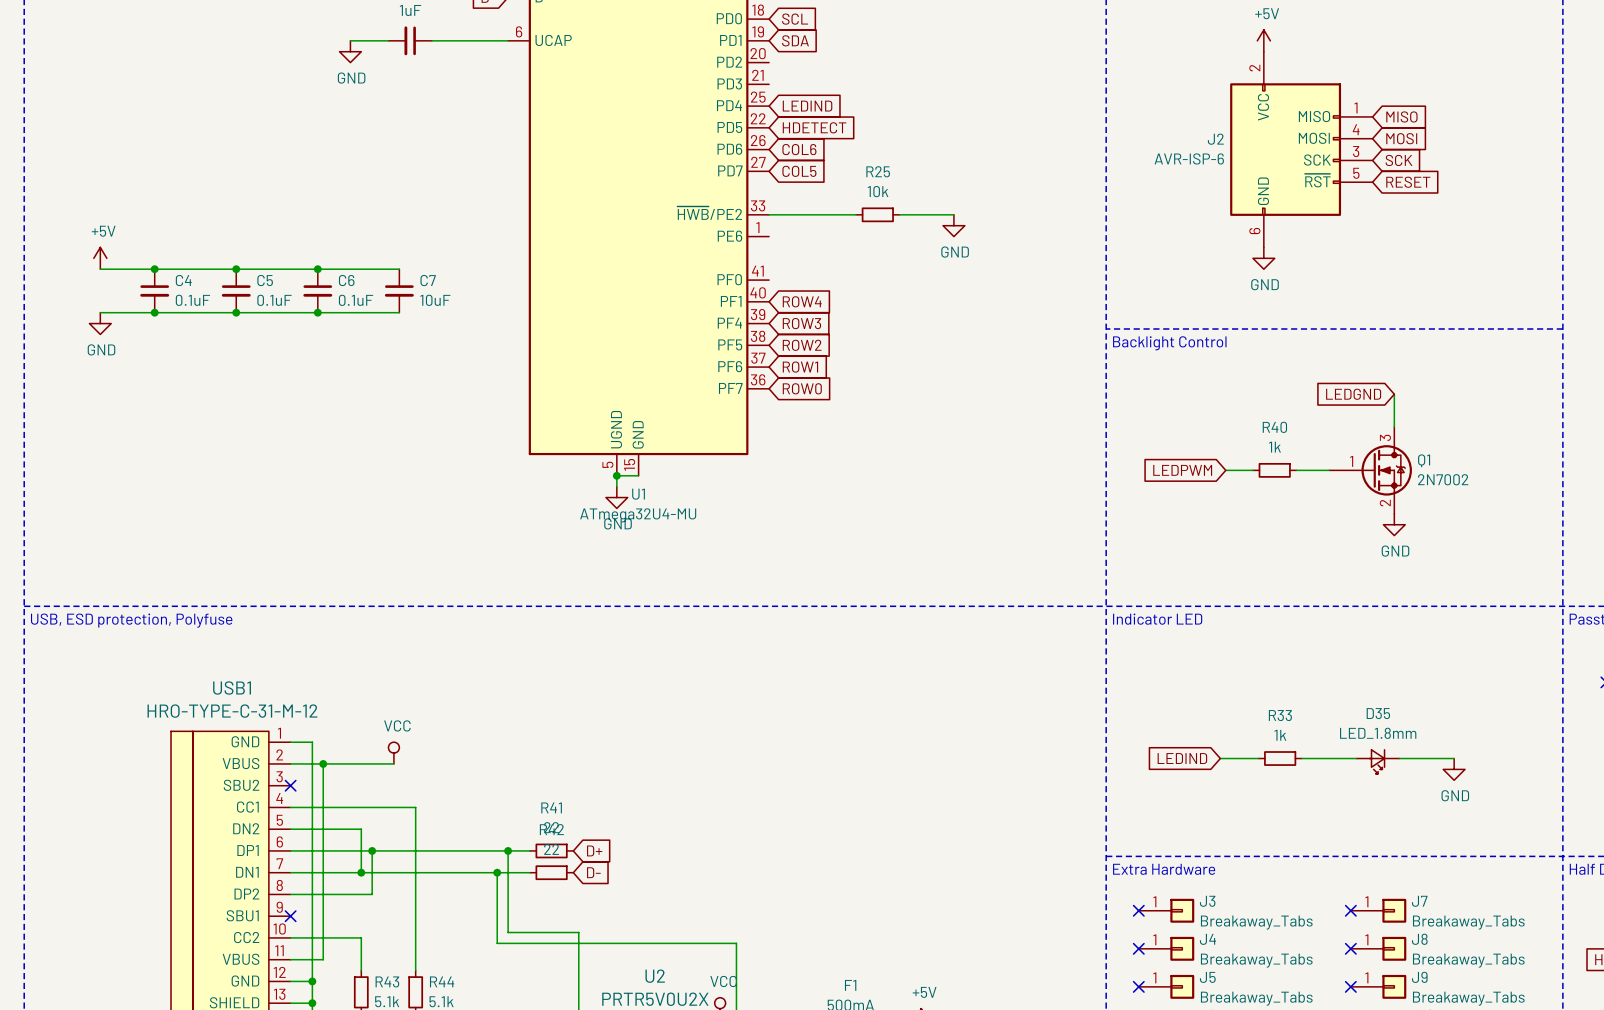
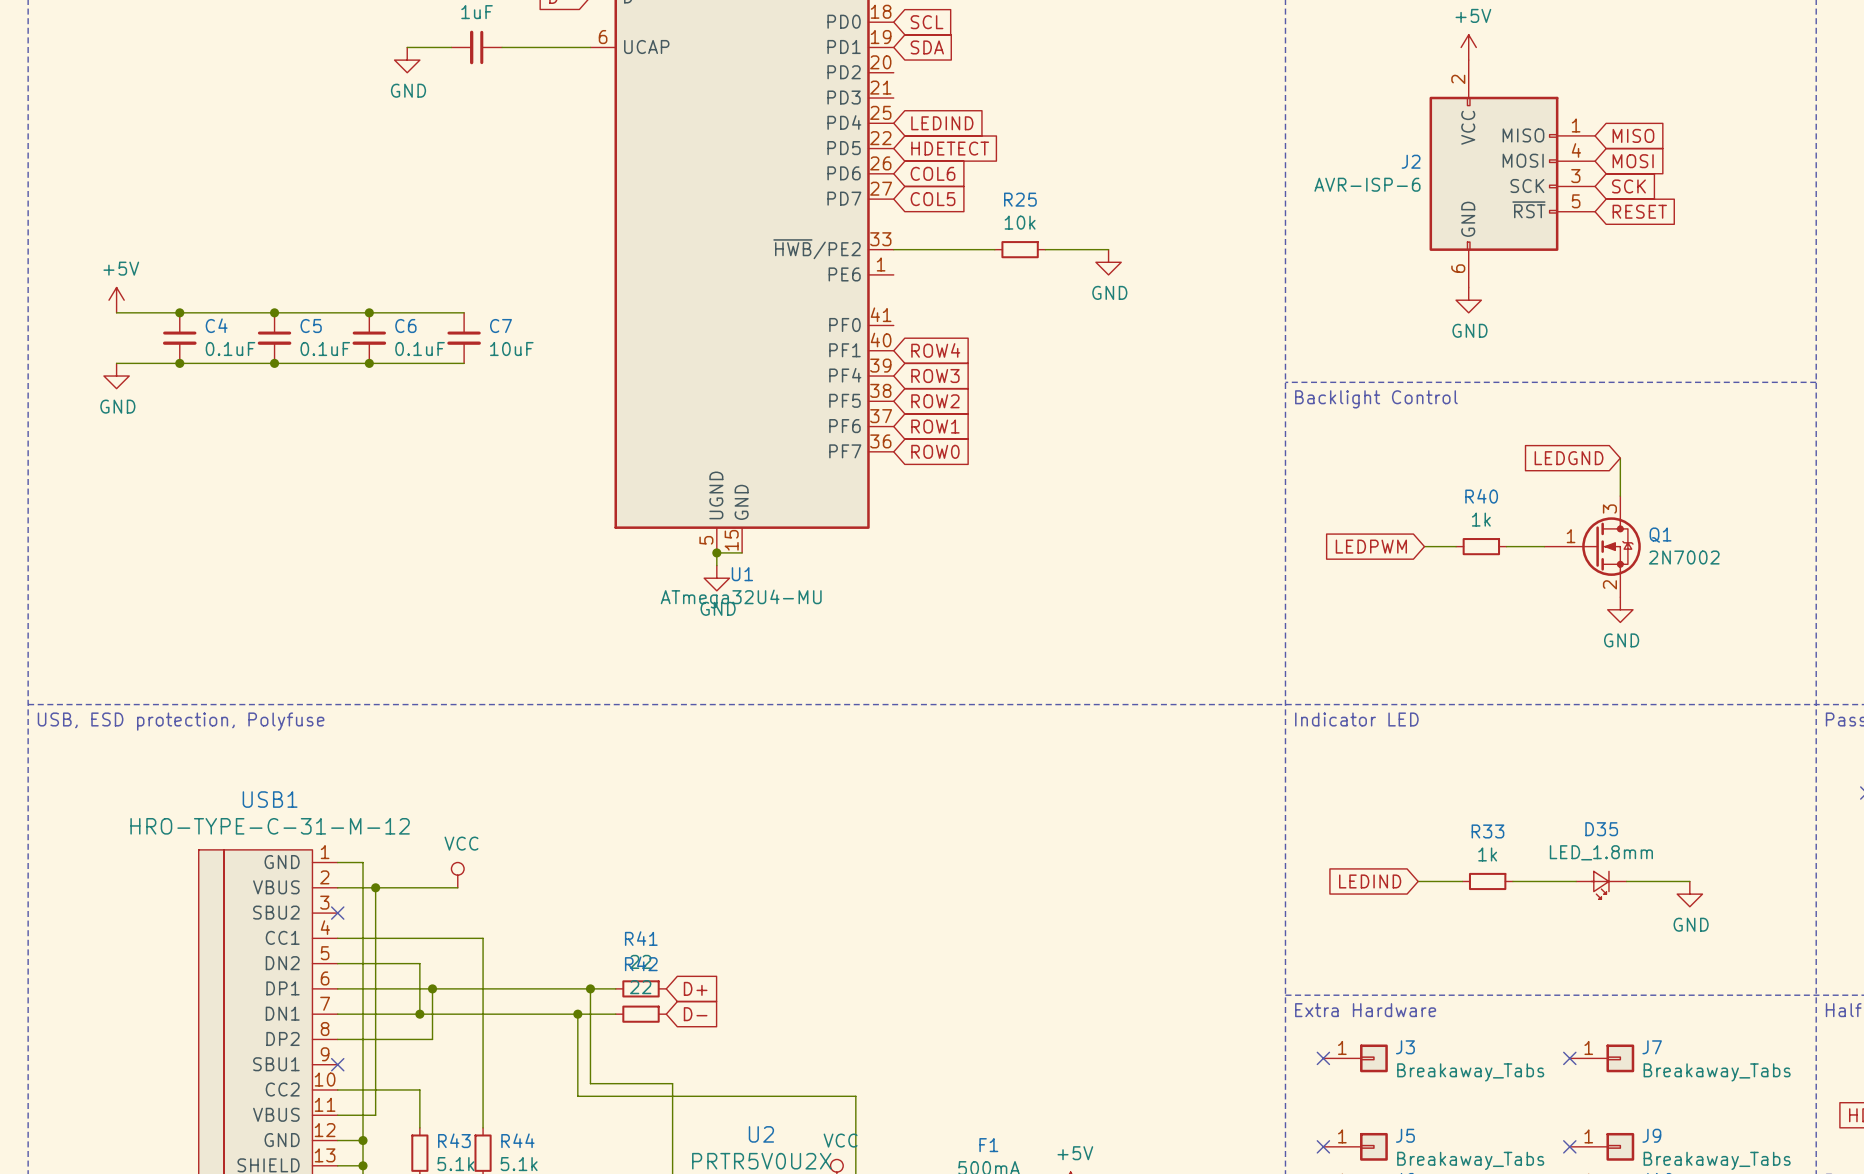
no-connect mark: (1138, 948) -> none
J4: Breakaway_Tabs (1166, 948) -> none
no-connect mark: (1350, 948) -> none
J8: Breakaway_Tabs (1378, 948) -> none

